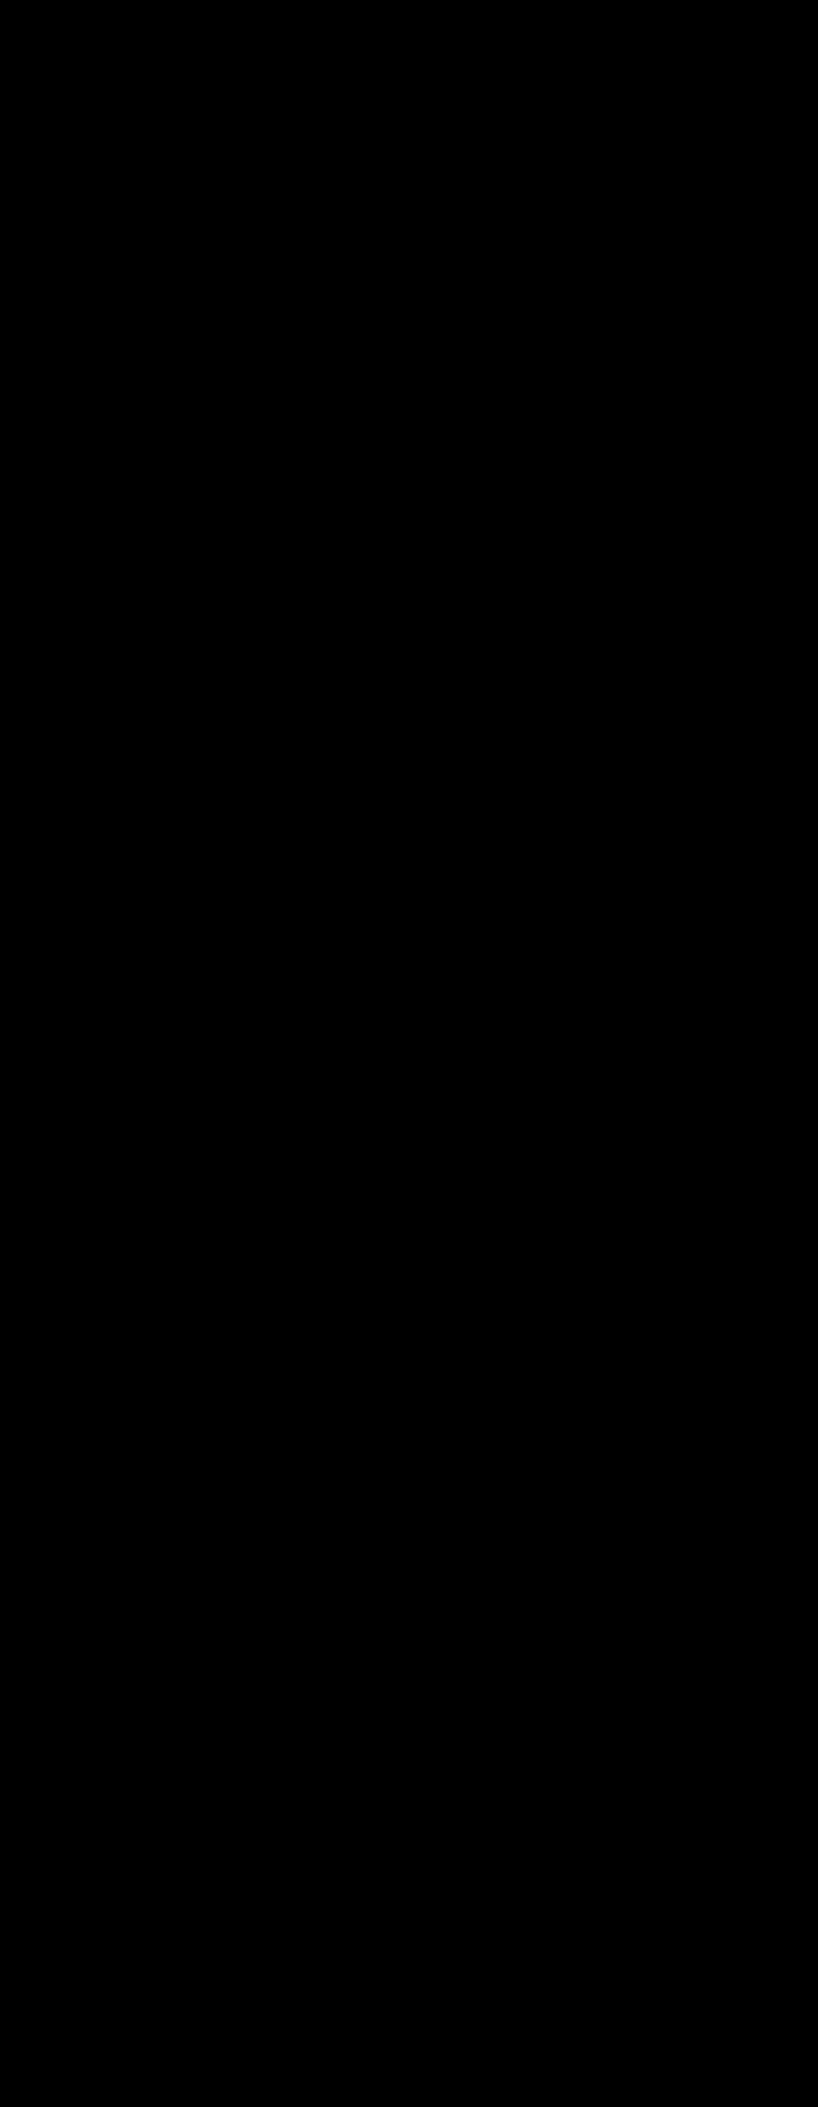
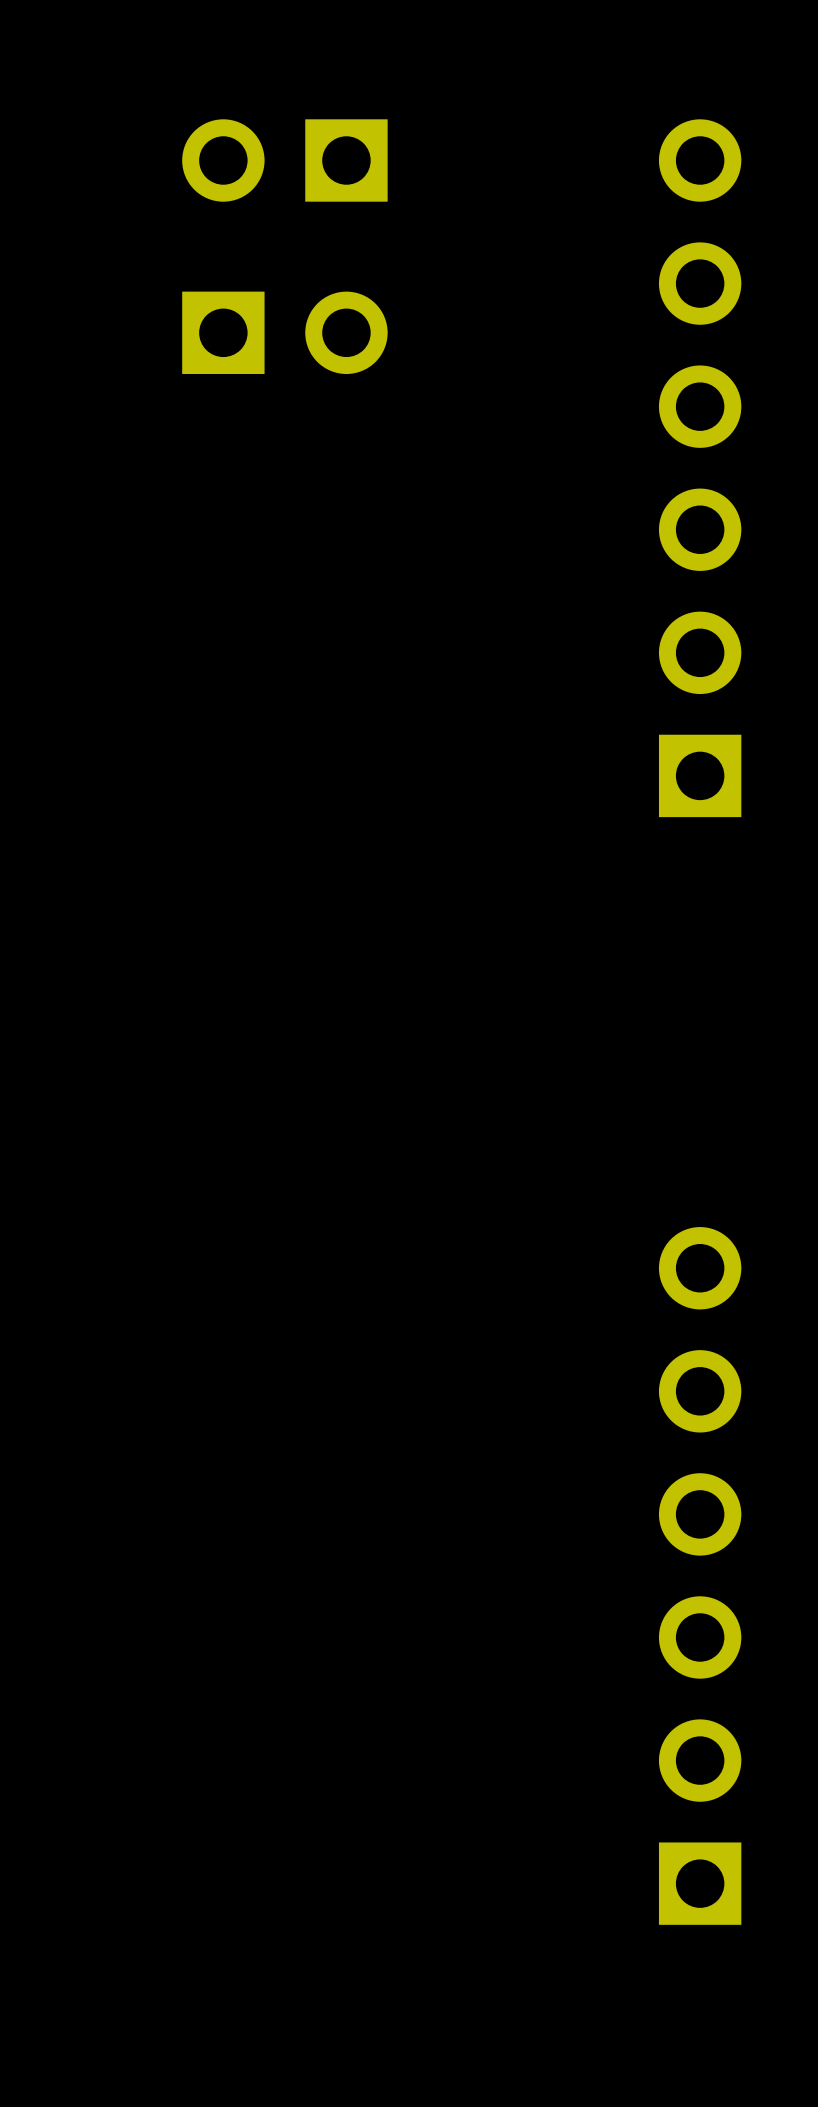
part: none -> (284, 160)
part: none -> (284, 332)
part: none -> (700, 468)
part: none -> (700, 1575)

